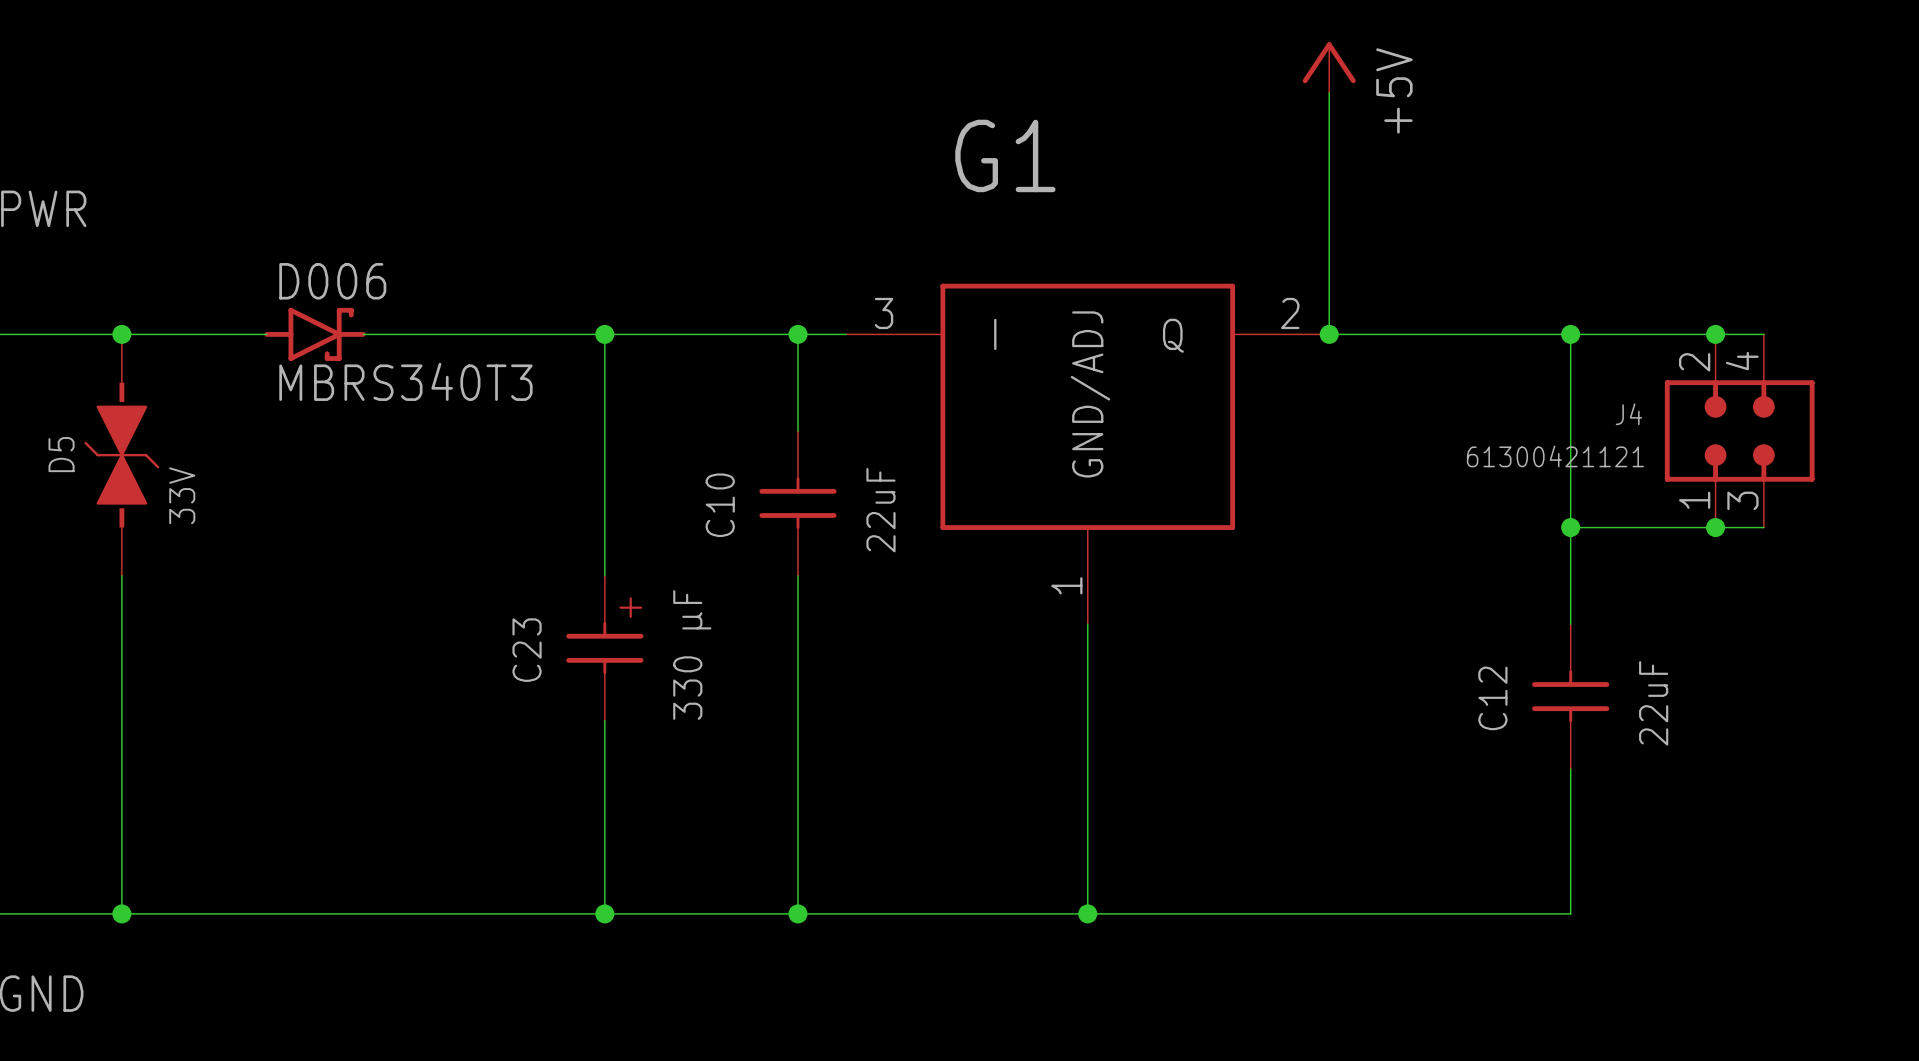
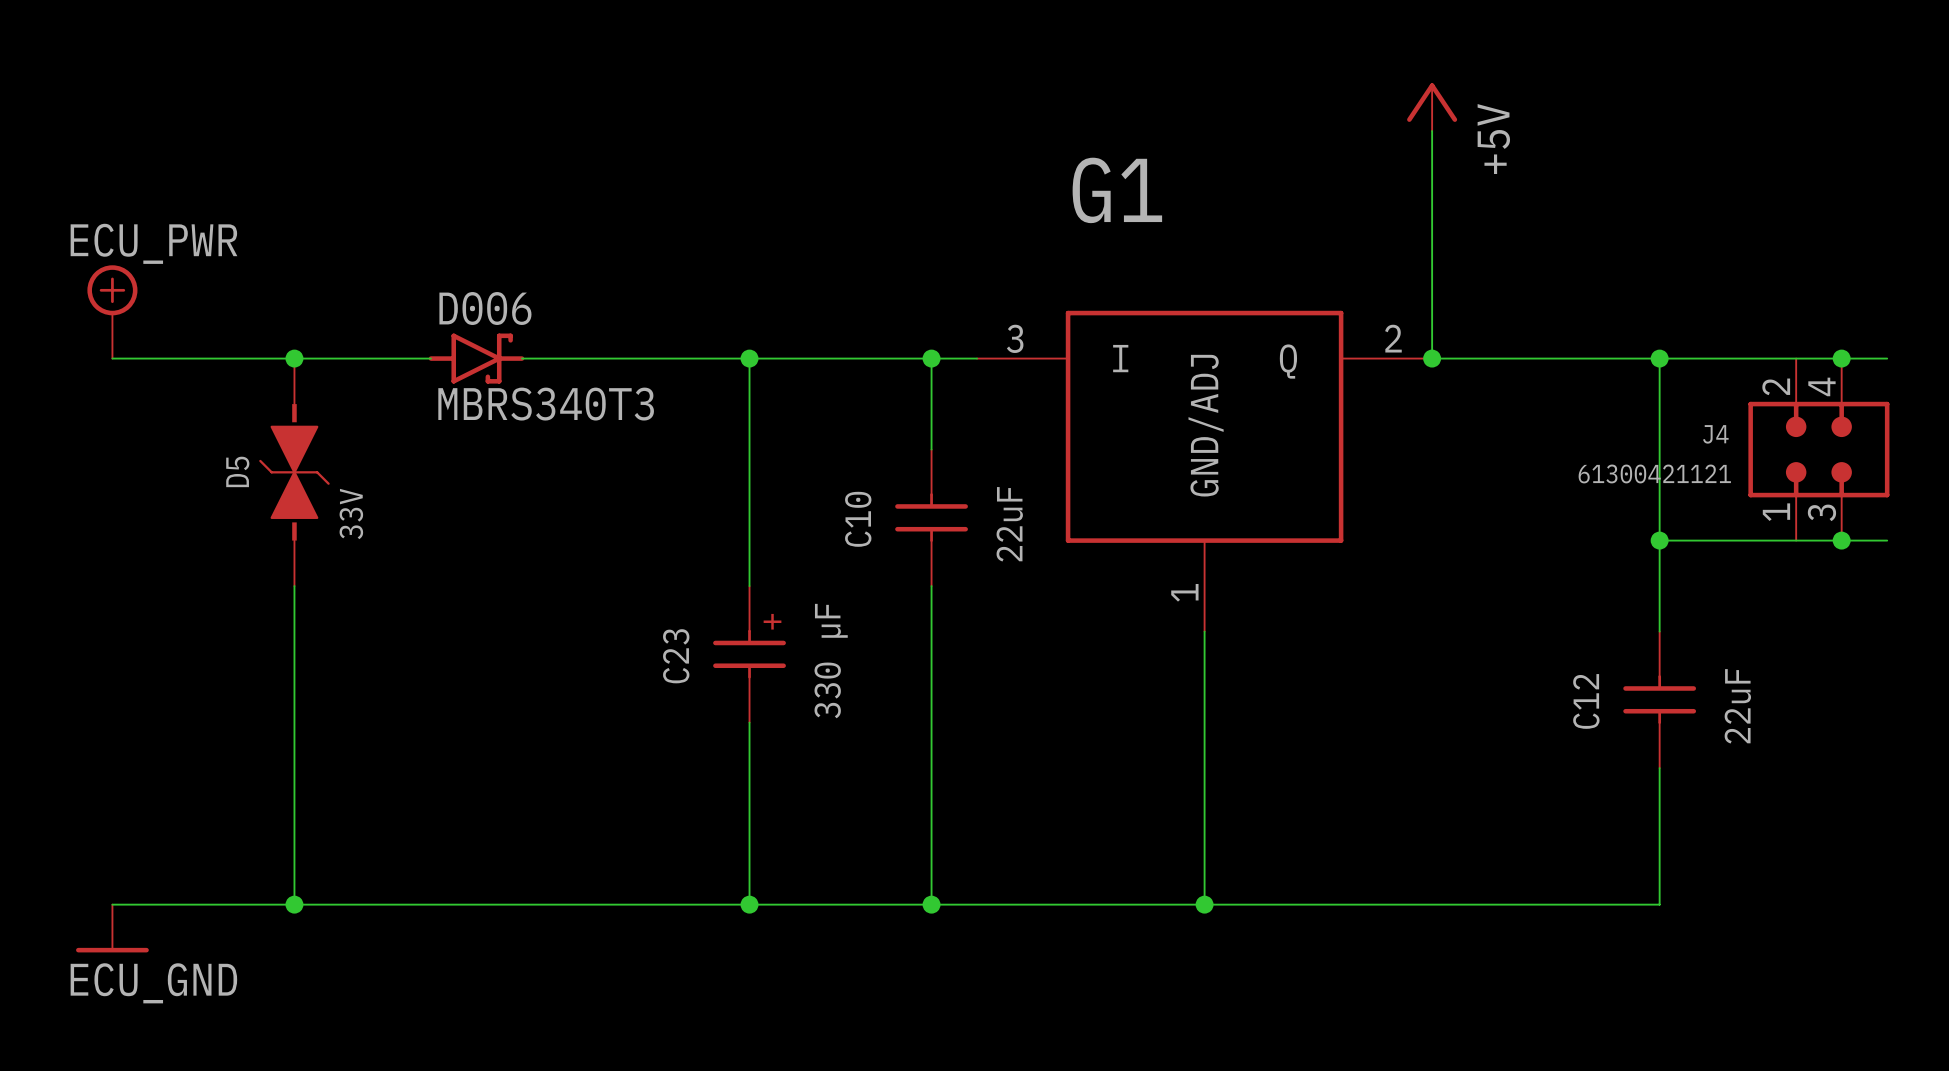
junction position: (1715, 334) -> (1841, 358)
wire: none -> (1841, 358) (1887, 358)
junction position: (1715, 527) -> (1841, 540)
wire: none -> (1841, 540) (1887, 540)

